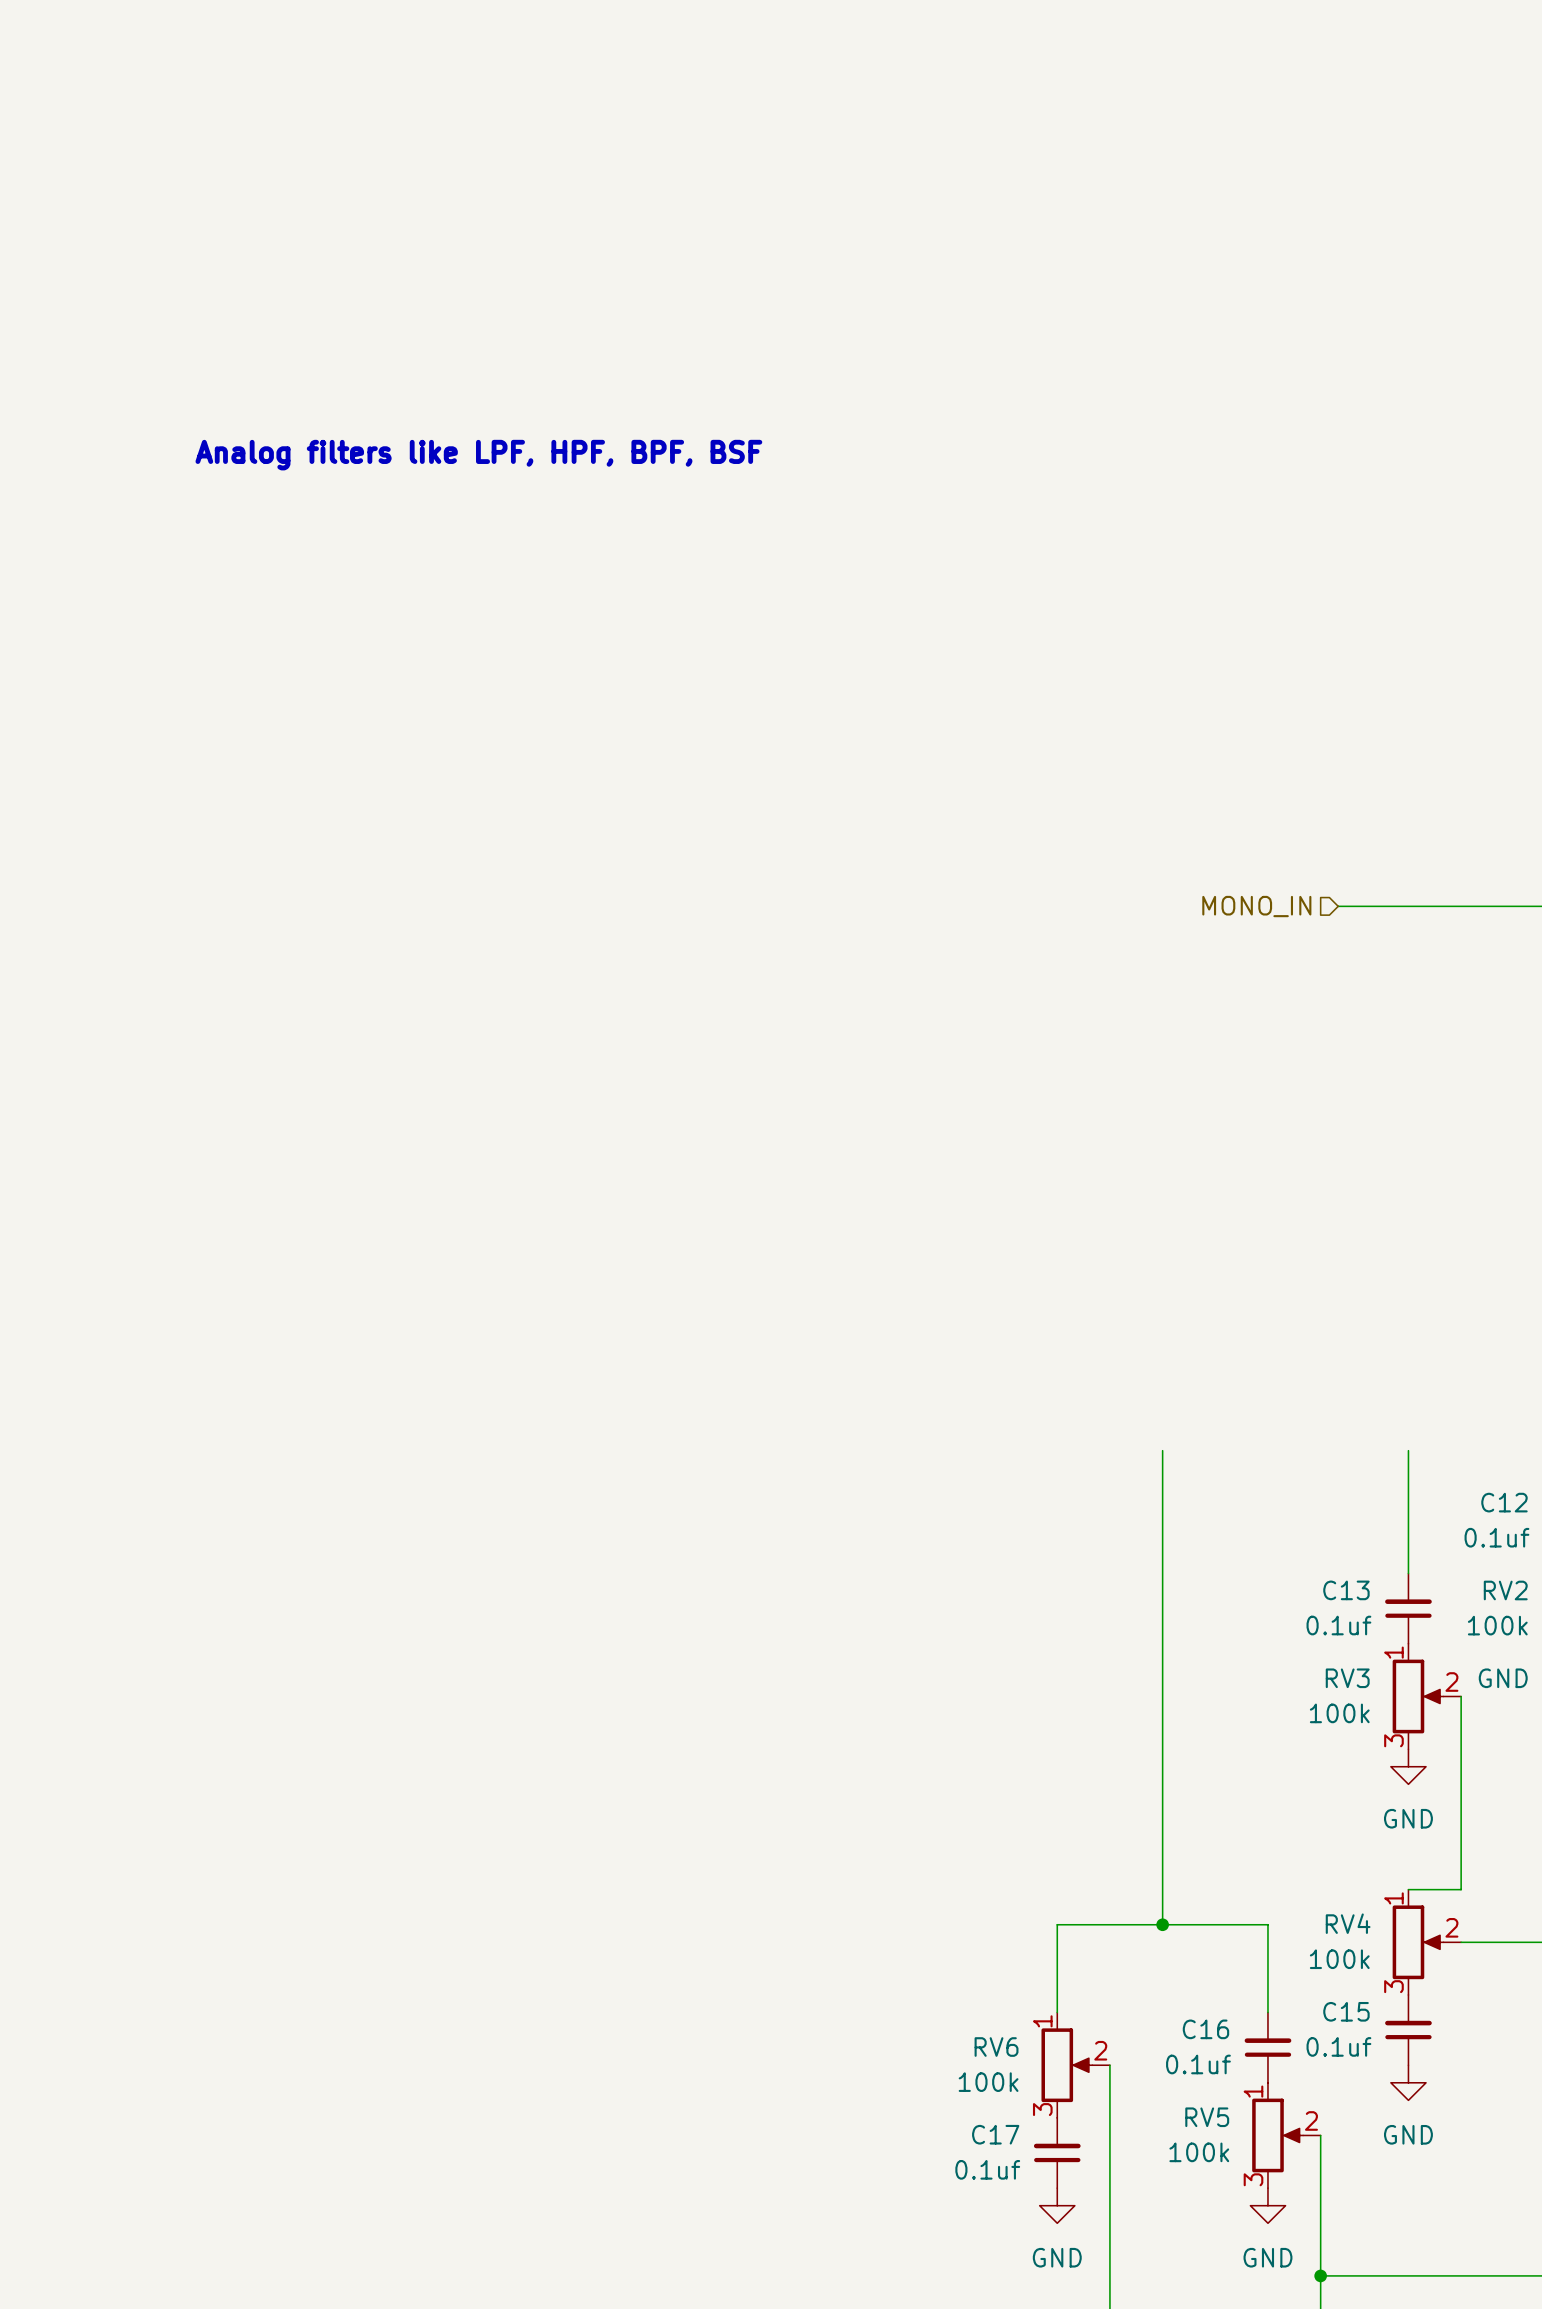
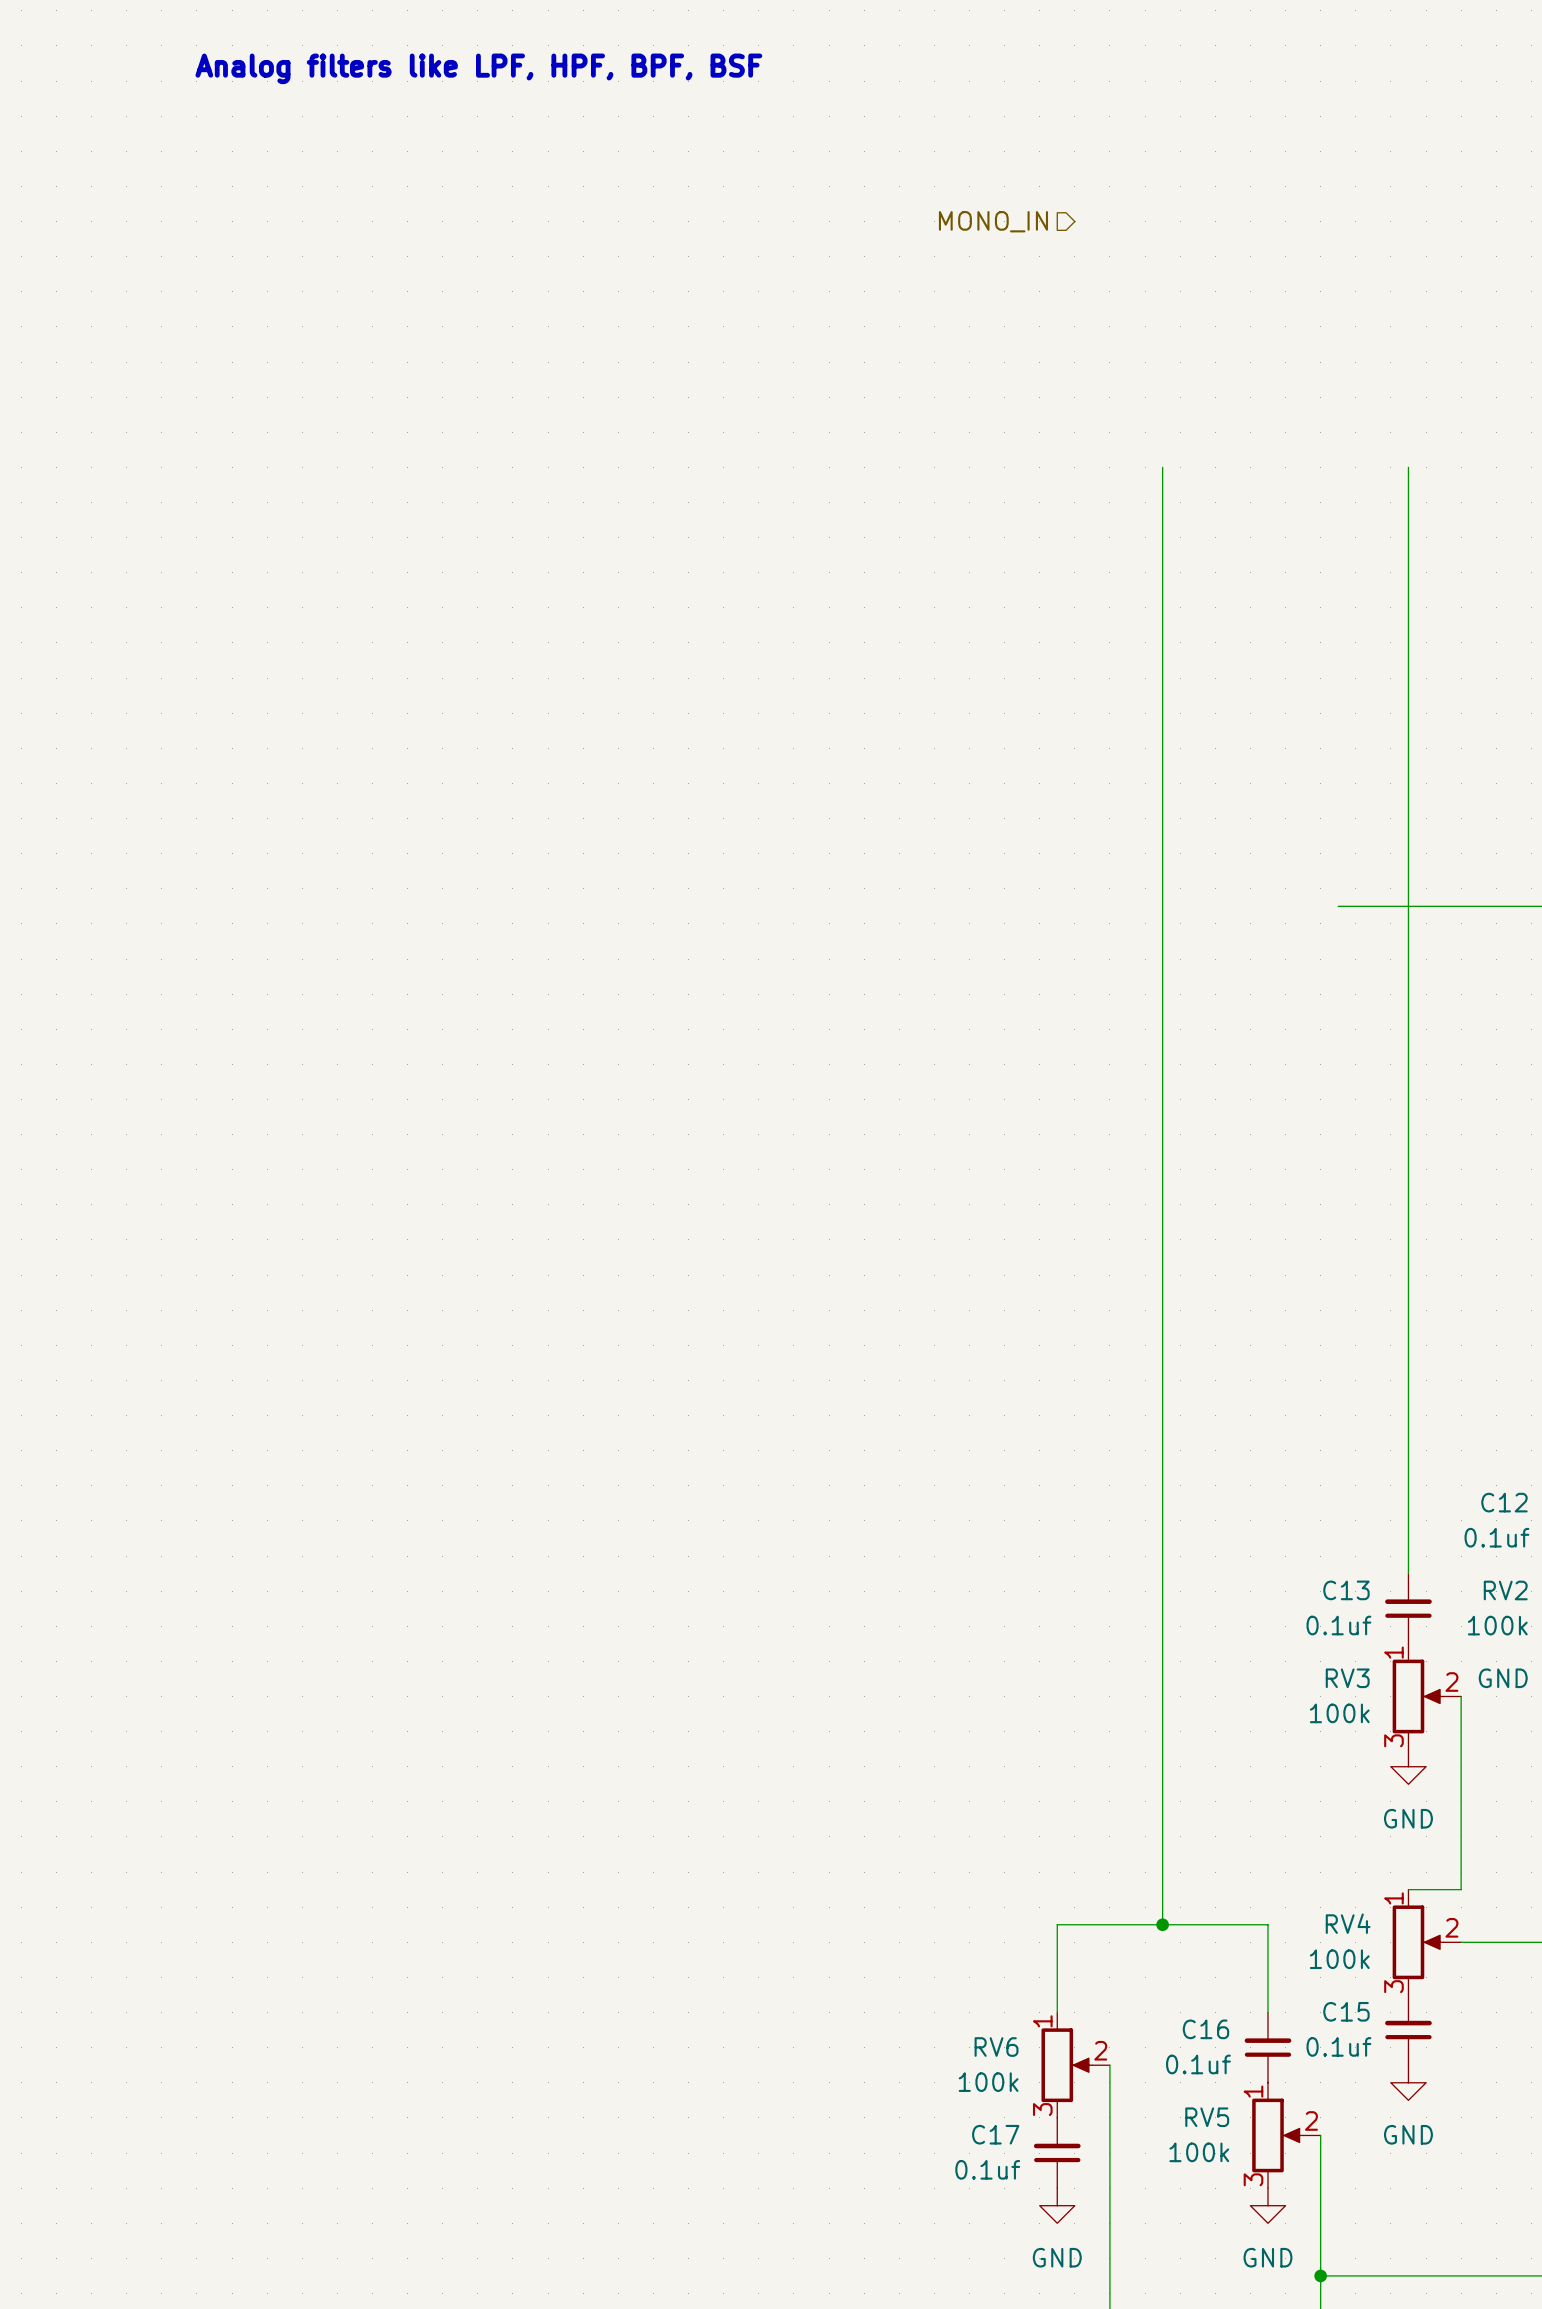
text: none -> Analog filters like LPF, HPF, BPF, BSF (478, 68)
hierarchical label: none -> MONO_IN (993, 221)
text: Analog filters like LPF, HPF, BPF, BSF (478, 455) -> none
wire: none -> (1162, 467) (1162, 1450)
wire: none -> (1408, 467) (1408, 1450)
hierarchical label: MONO_IN (1256, 906) -> none

